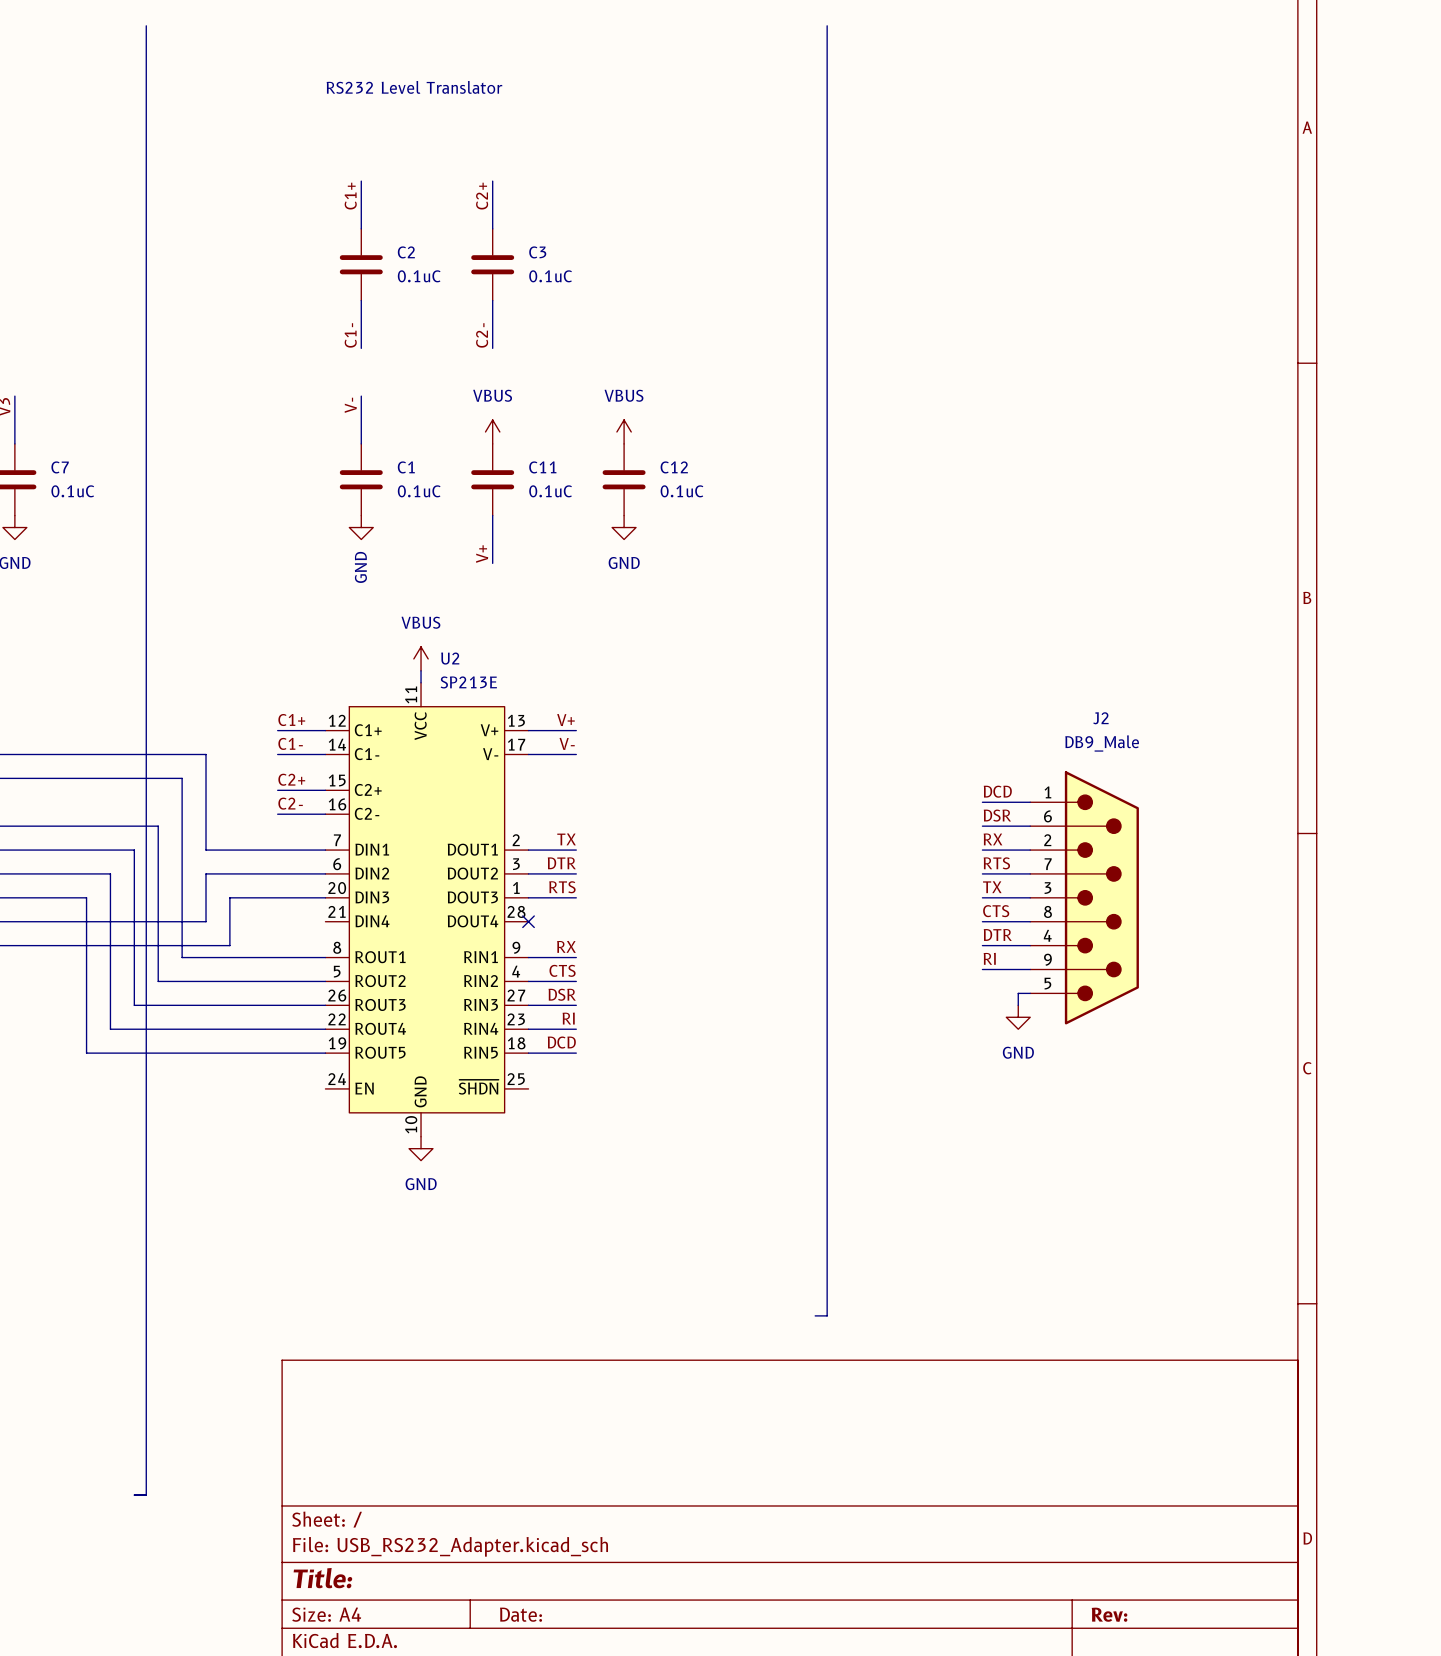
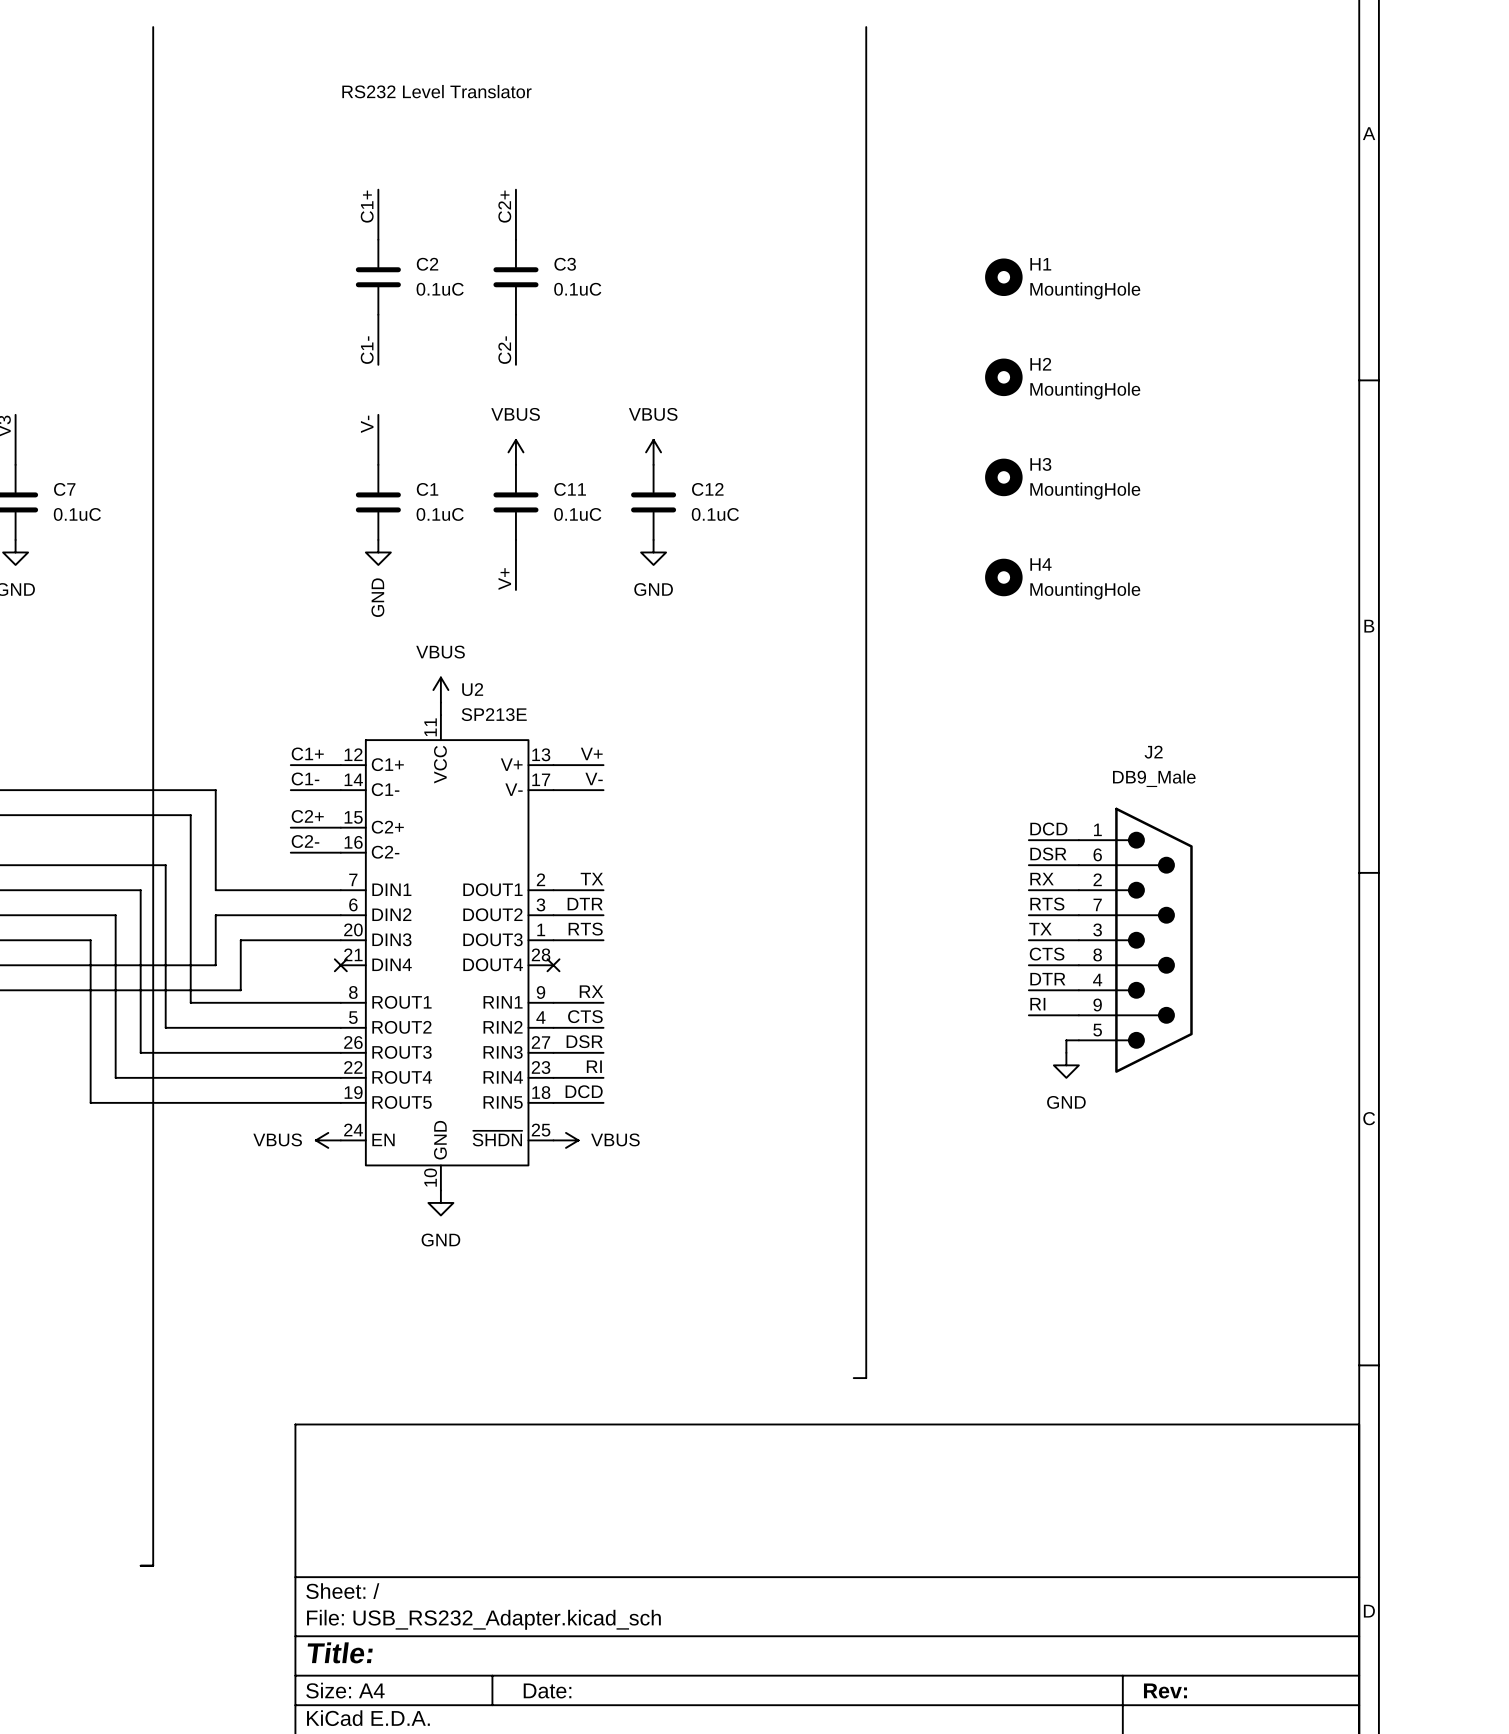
H1: none -> MountingHole (1003, 277)
H2: none -> MountingHole (1003, 377)
H3: none -> MountingHole (1003, 477)
H4: none -> MountingHole (1003, 577)
no-connect mark: none -> (340, 965)
power symbol: none -> VBUS (328, 1140)
power symbol: none -> VBUS (566, 1140)

